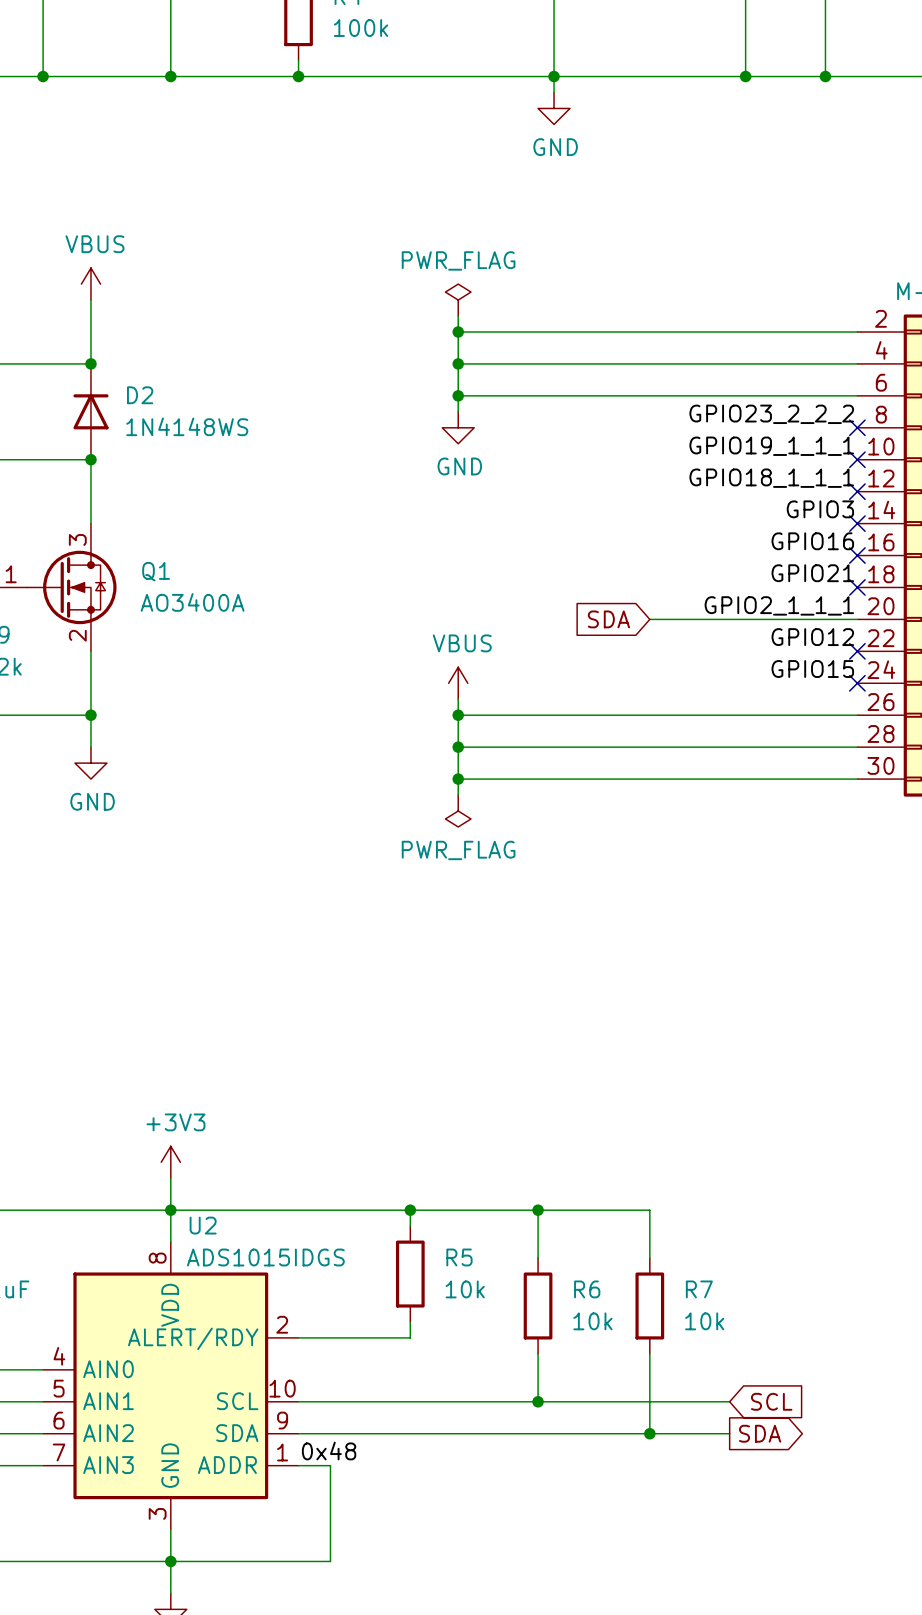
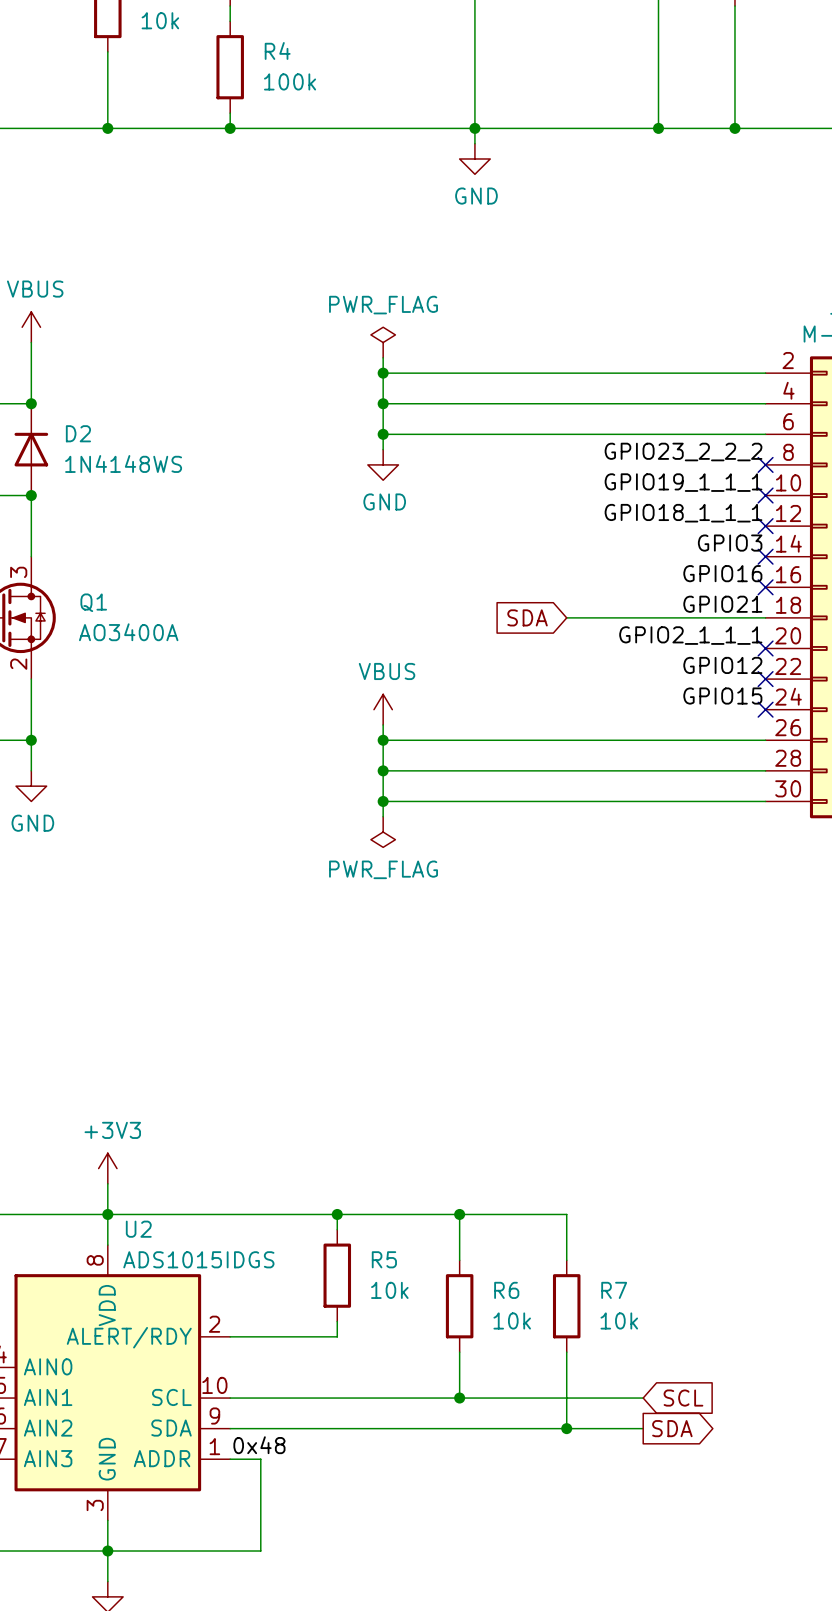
no-connect mark position: (857, 587) -> (765, 648)
global label position: SDA (608, 619) -> SDA (527, 617)
wire: (649, 619) (857, 619) -> (566, 617) (765, 617)

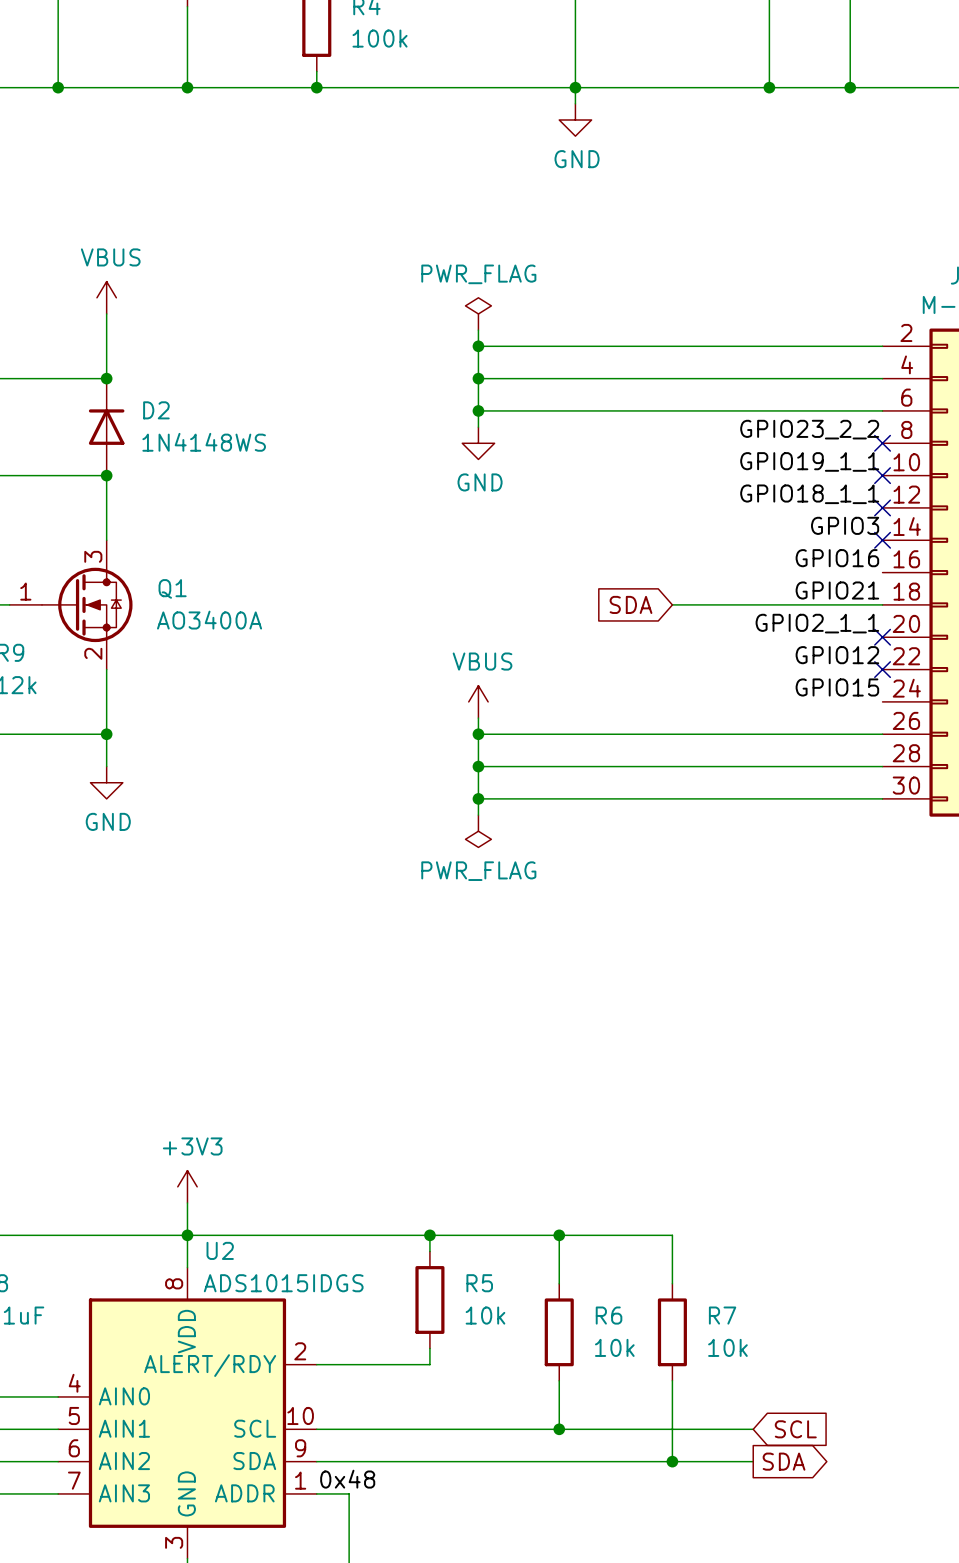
label: GPIO23_2_2_2 (683, 452) -> GPIO23_2_2 (809, 429)
label: GPIO19_1_1_1 (683, 482) -> GPIO19_1_1 (809, 461)
label: GPIO18_1_1_1 (683, 513) -> GPIO18_1_1 (809, 494)
no-connect mark: (765, 587) -> none
label: GPIO2_1_1_1 (690, 635) -> GPIO2_1_1 (817, 623)
no-connect mark: (765, 709) -> none

